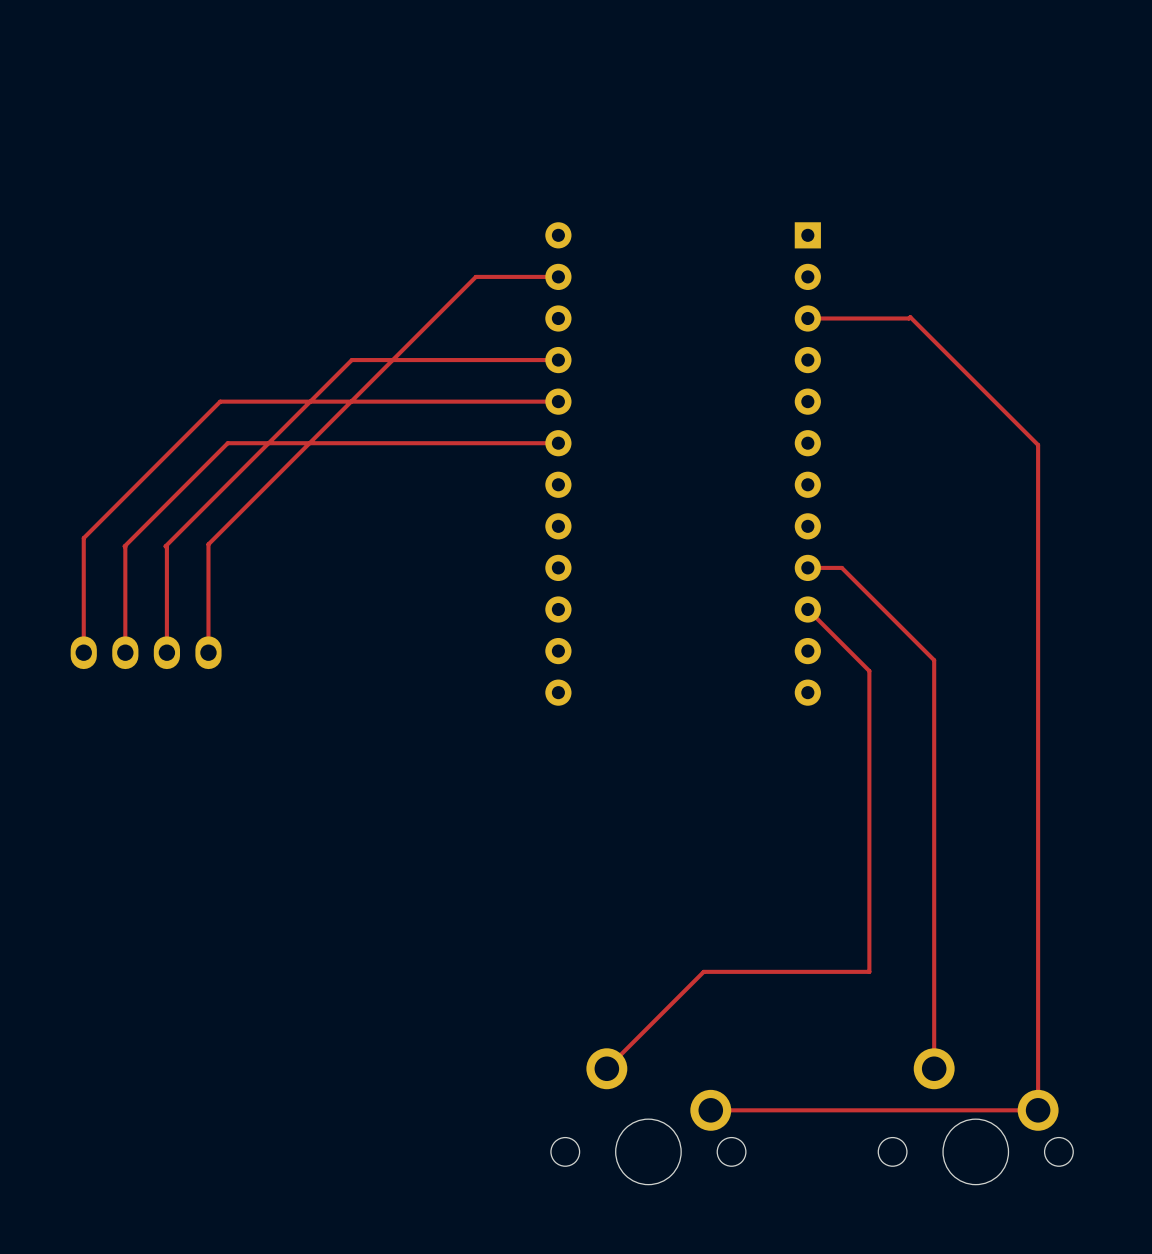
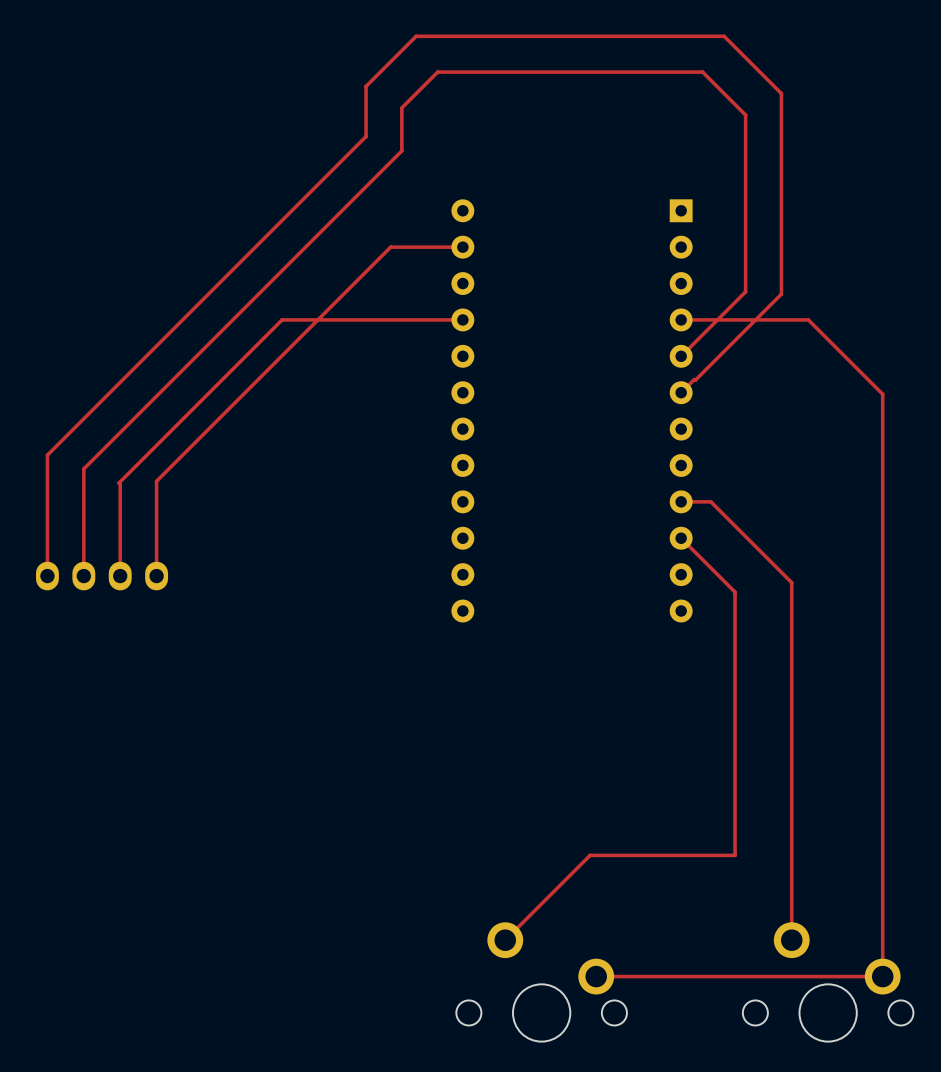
top track: (807, 318) (910, 317) (953, 360) -> (681, 319) (808, 319)
top track: (558, 401) (220, 401) (83, 538) -> (681, 392) (781, 294) (781, 93) (724, 36) (416, 36) (366, 86) (366, 136) (47, 455) (47, 475)
top track: (558, 443) (227, 443) (125, 546) -> (681, 356) (745, 291) (745, 115) (702, 72) (437, 72) (401, 107) (401, 150) (83, 468) (83, 483)

